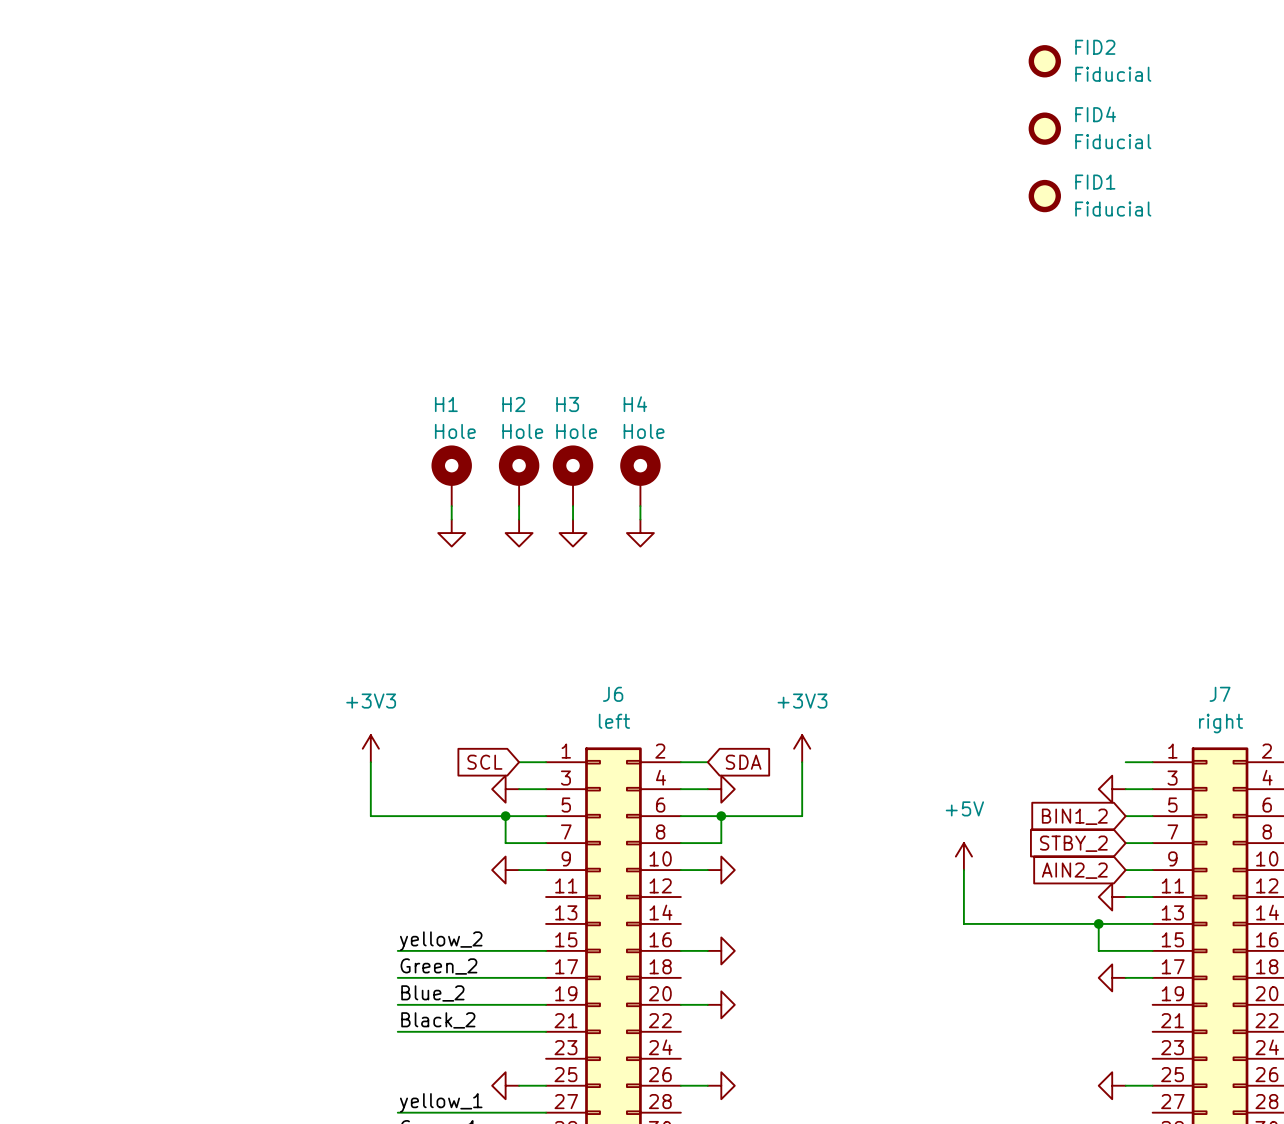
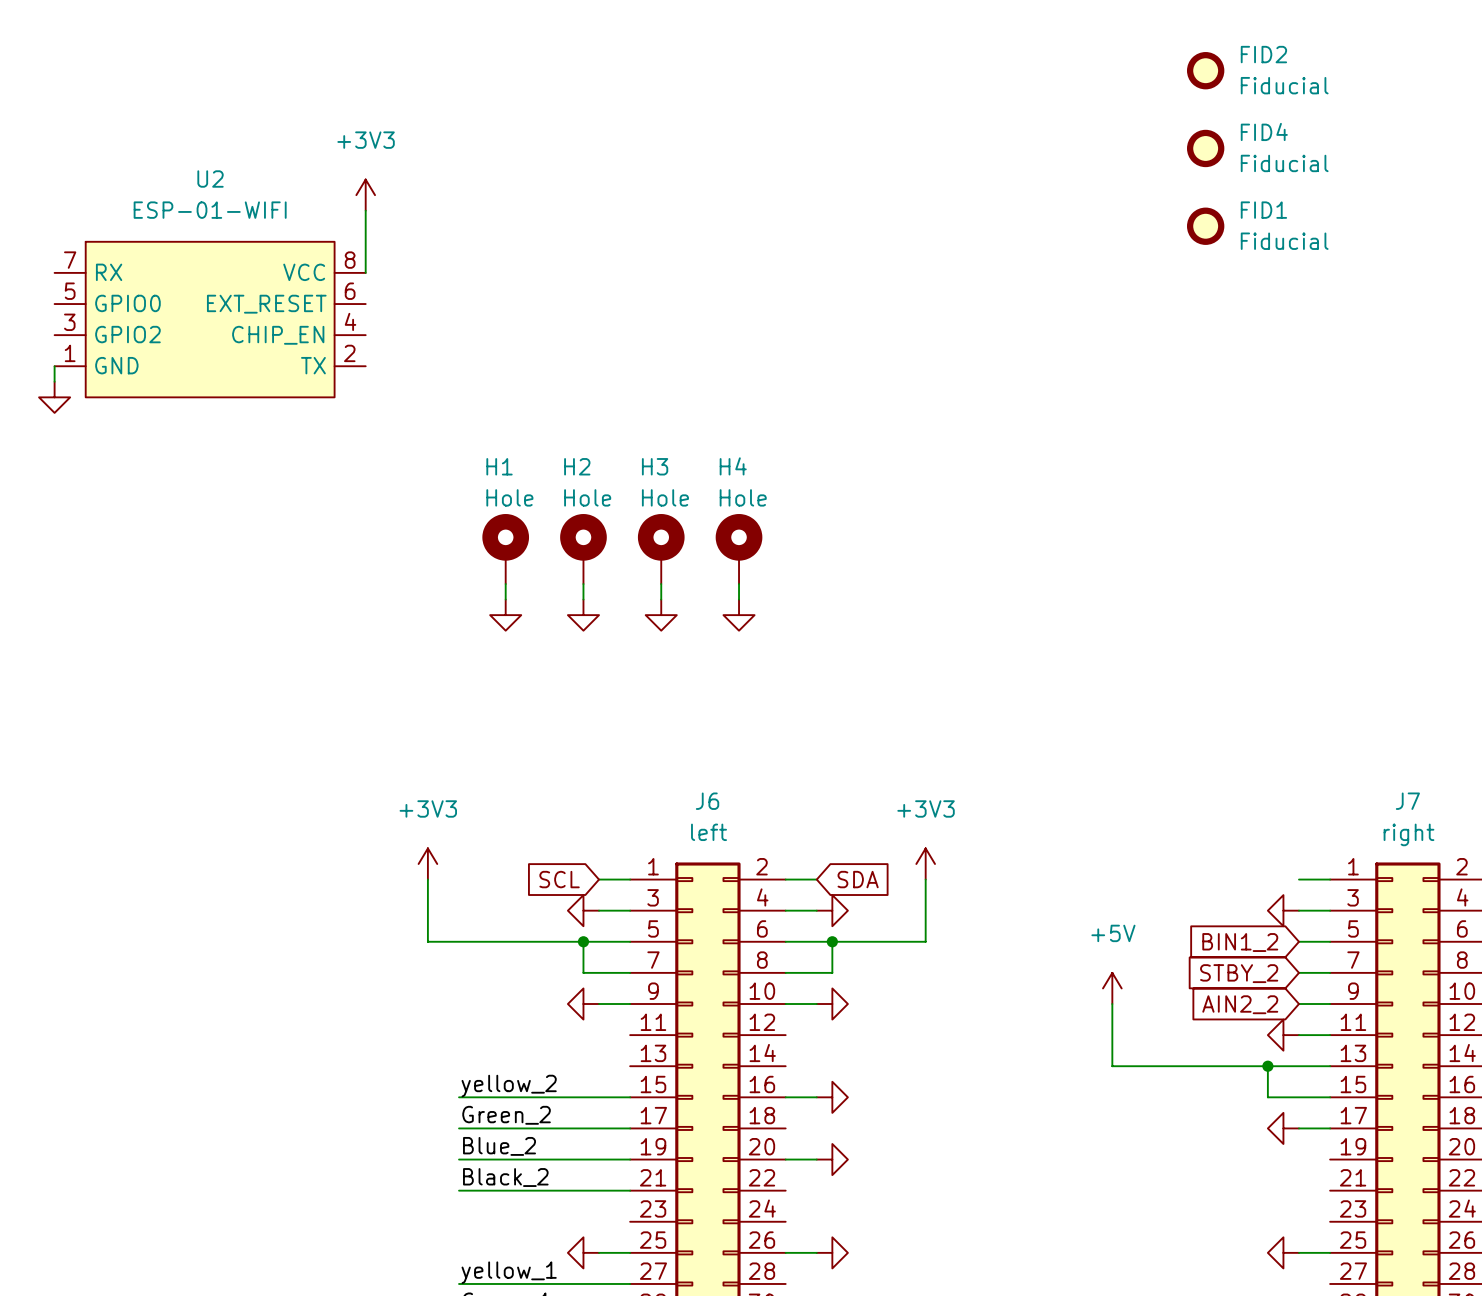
power symbol: none -> +3V3 (365, 195)
wire: none -> (365, 210) (365, 272)
U2: none -> ESP-01-WIFI (210, 319)
wire: none -> (54, 366) (54, 381)
power symbol: none -> (54, 397)
H1 position: (451, 475) -> (505, 549)
H2 position: (519, 475) -> (583, 549)
wire: (451, 506) (451, 519) -> (505, 584) (505, 599)
wire: (519, 506) (519, 519) -> (583, 584) (583, 599)
power symbol position: (451, 533) -> (505, 615)
power symbol position: (519, 533) -> (583, 615)

